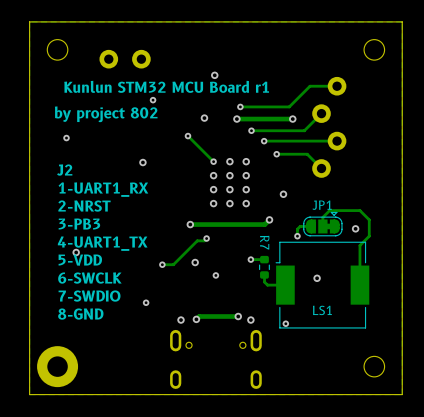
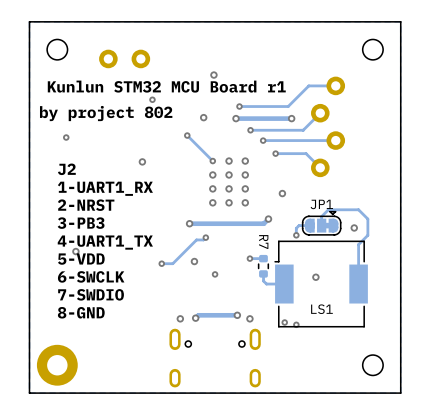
via: (146, 302) -> none
via: none -> (296, 324)

